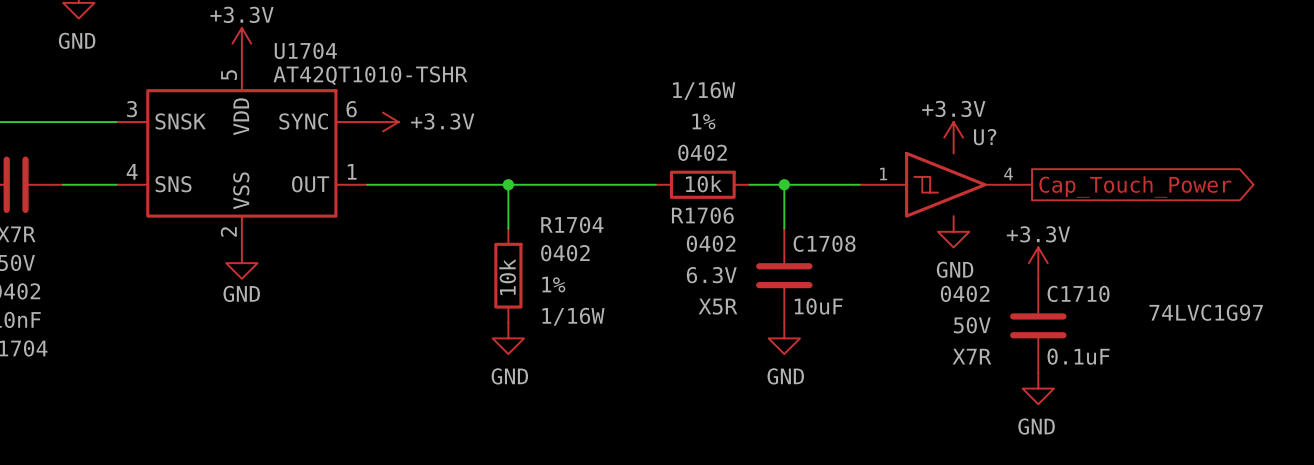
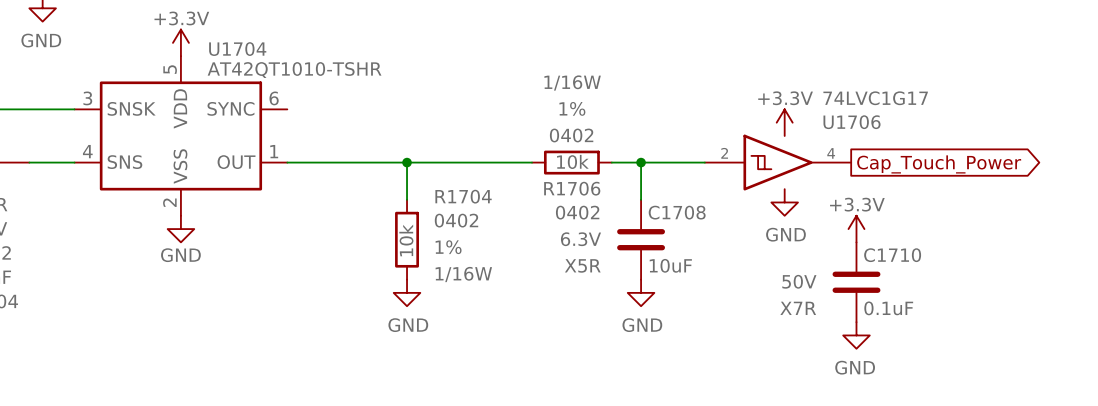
power symbol: +3.3V (382, 122) -> none
U? name: U? (985, 137) -> U1706 (852, 122)
U? pin number: 1 (883, 173) -> 2 (724, 153)
C1710 text: 0402 (965, 293) -> none
U? value: 74LVC1G97 (1206, 312) -> 74LVC1G17 (875, 98)

